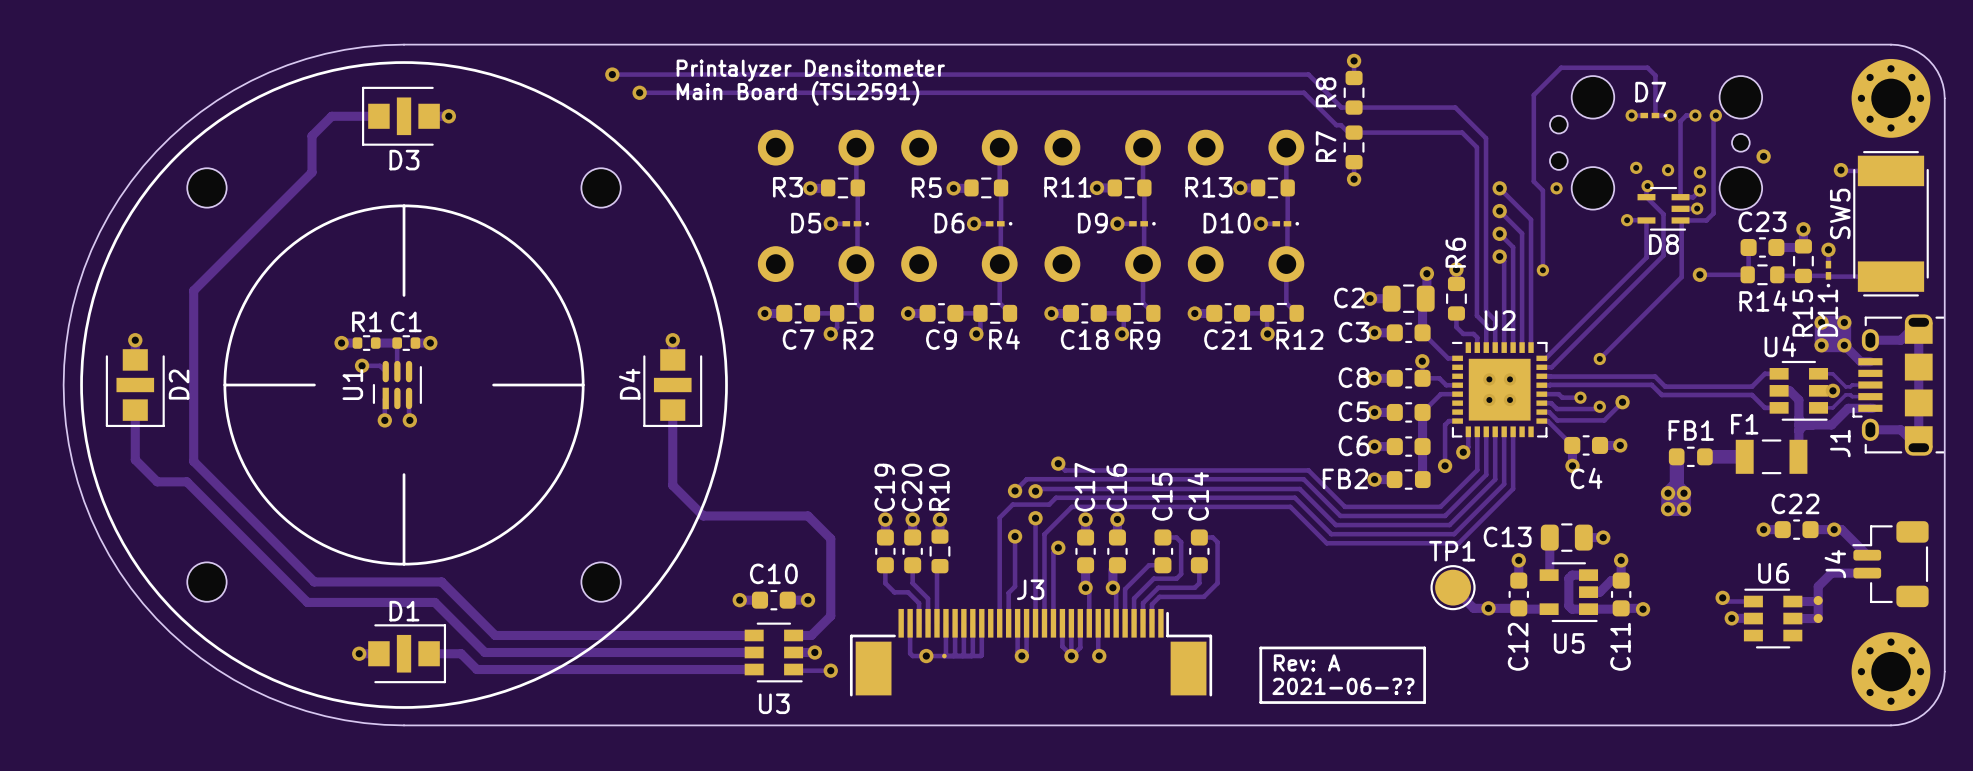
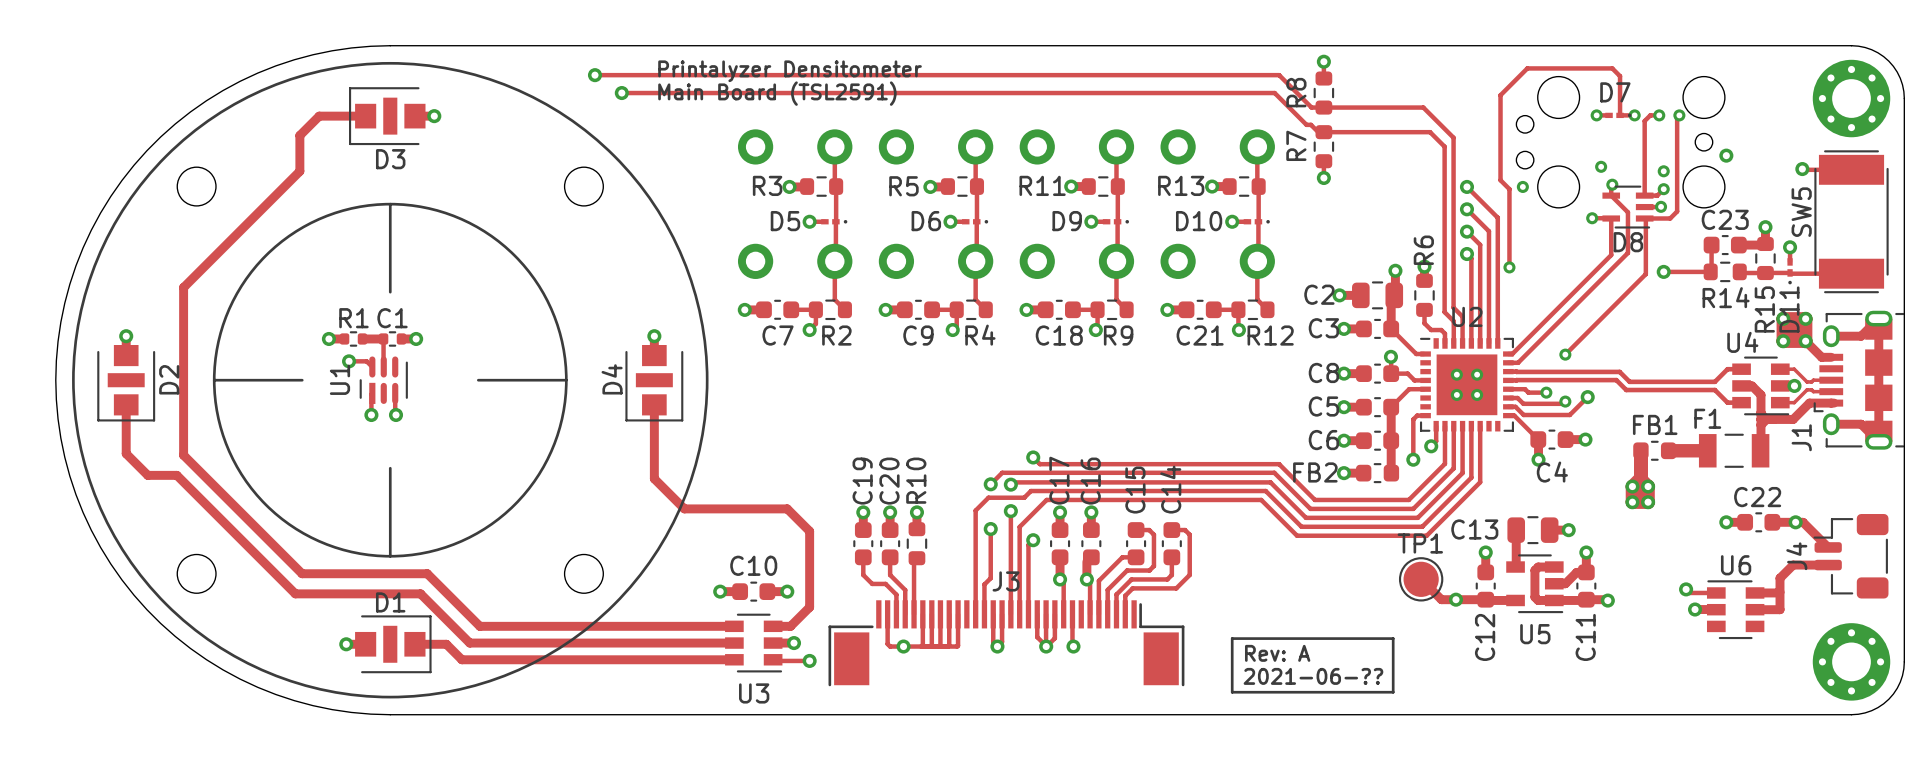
via: (1668, 170) -> none

